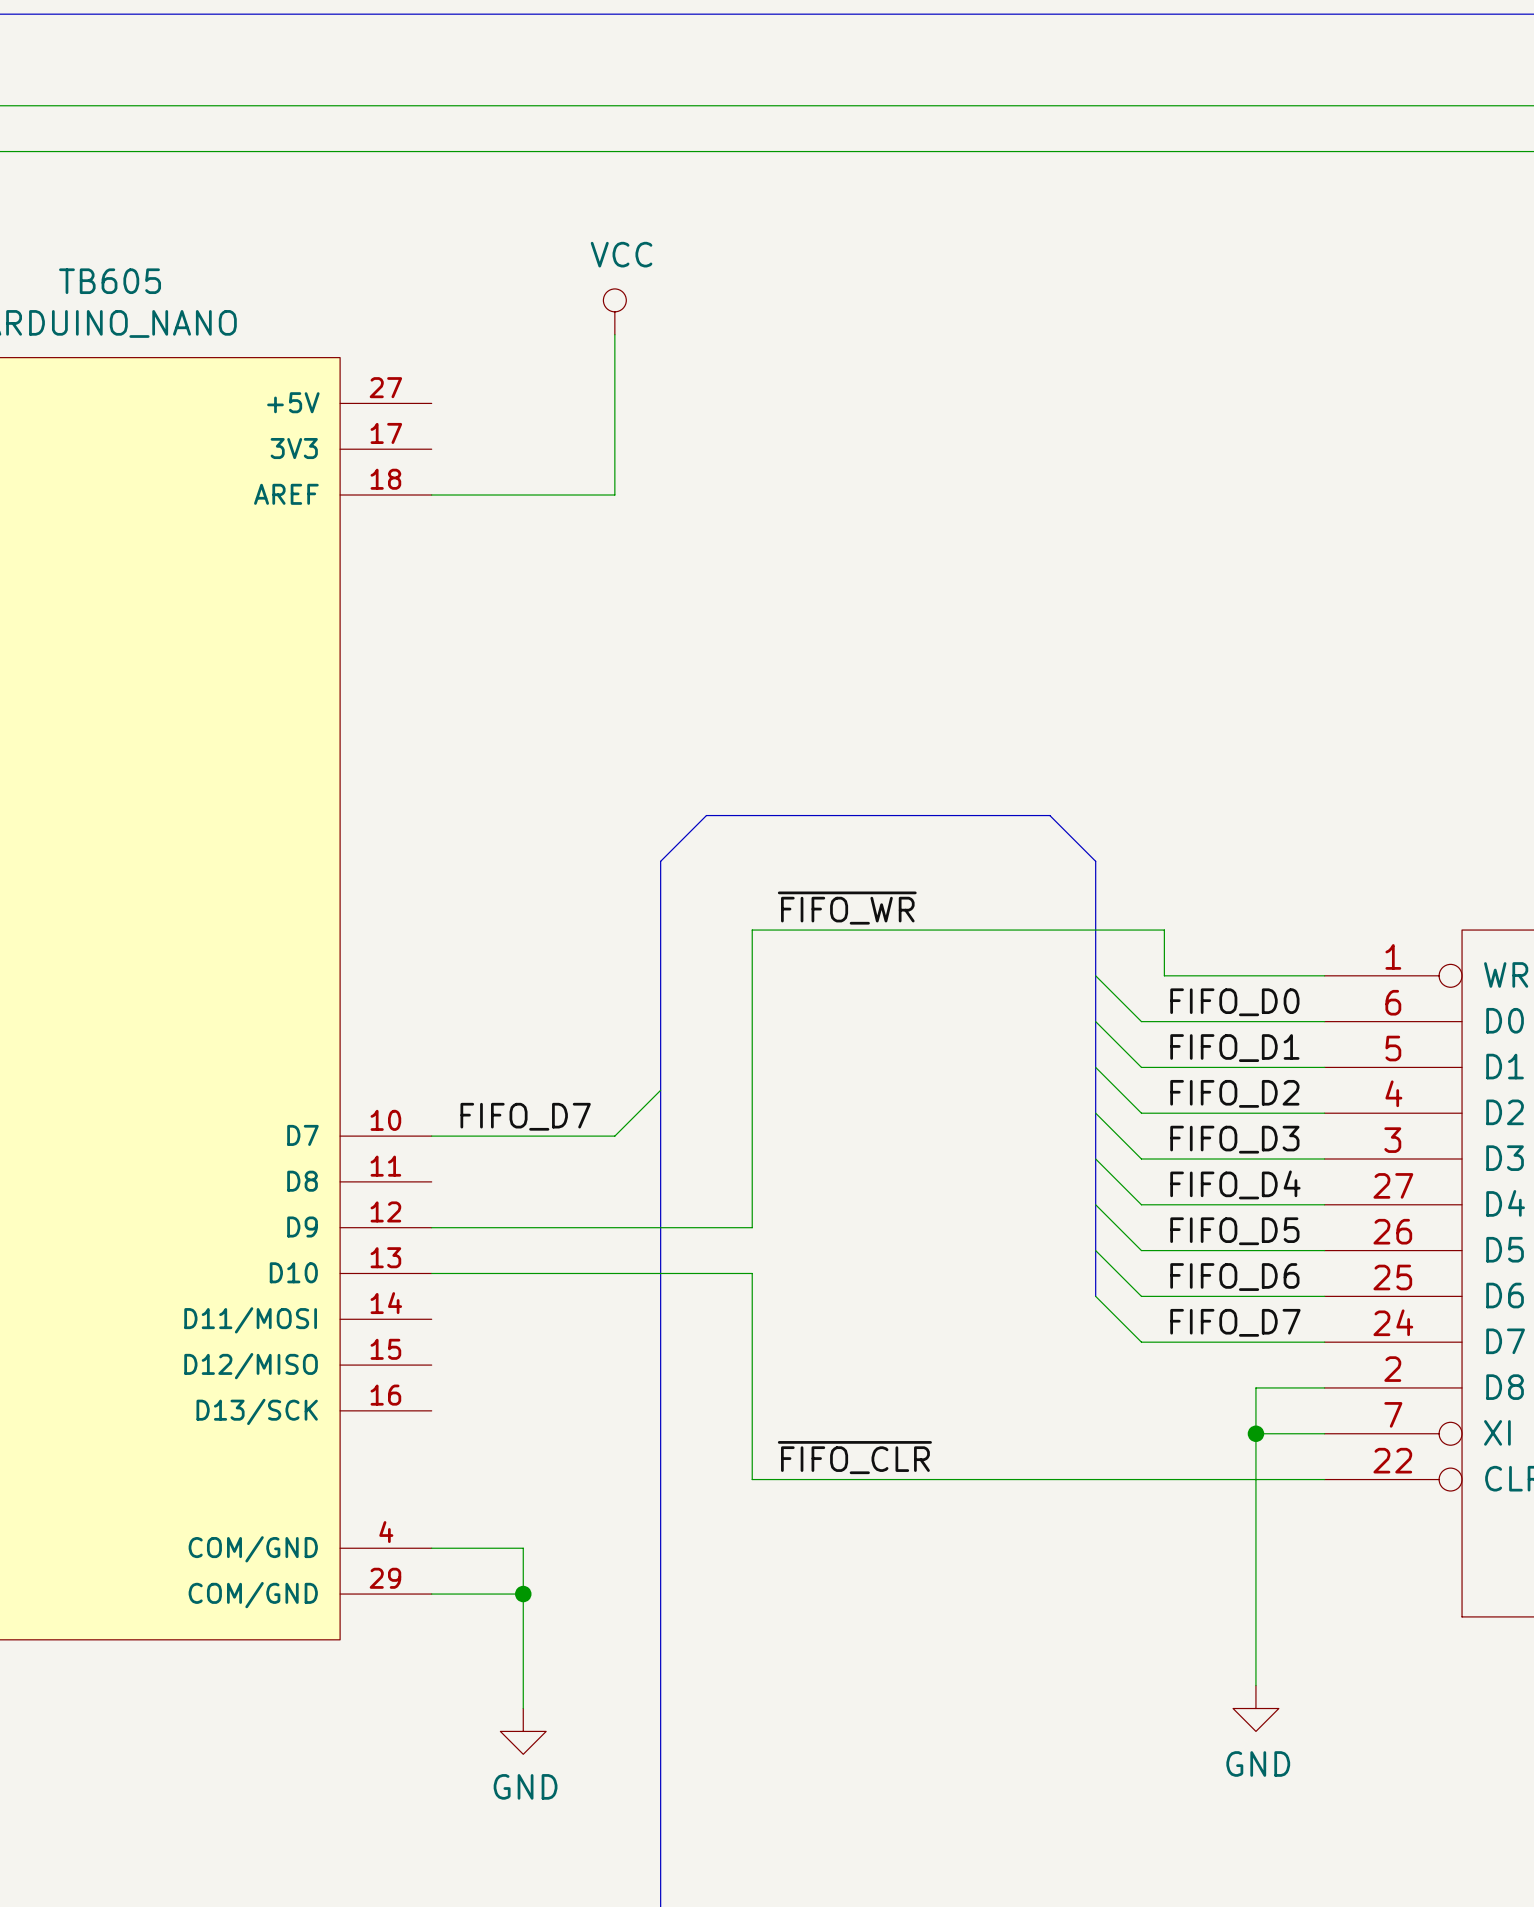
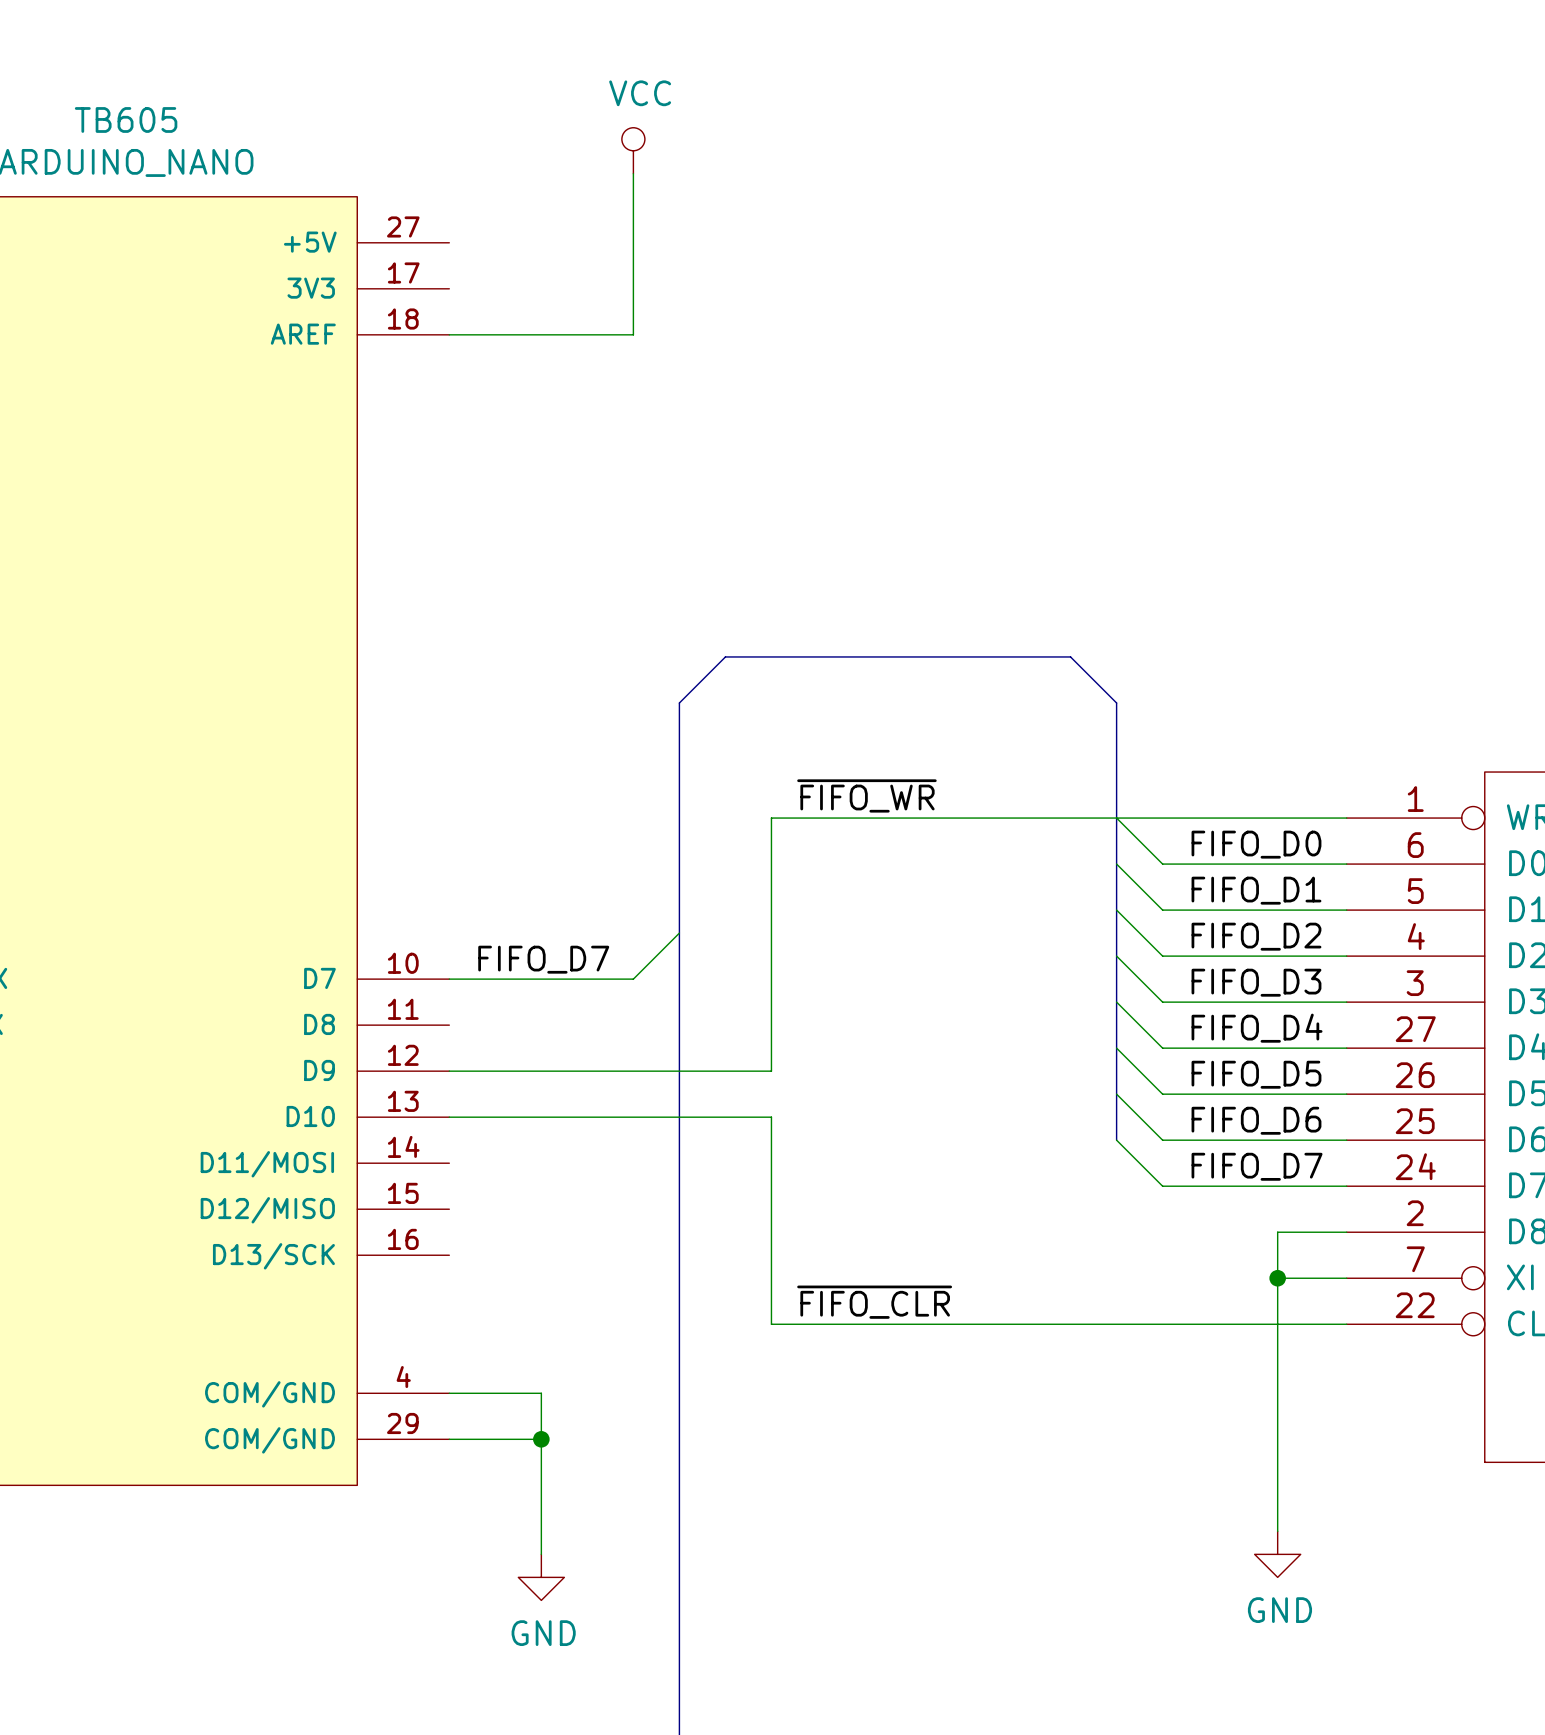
label position: ~{FIFO_WR} (847, 908) -> ~{FIFO_WR} (866, 795)
wire: (752, 975) (752, 930) (1164, 930) (1164, 975) -> (771, 818) (1185, 818)

